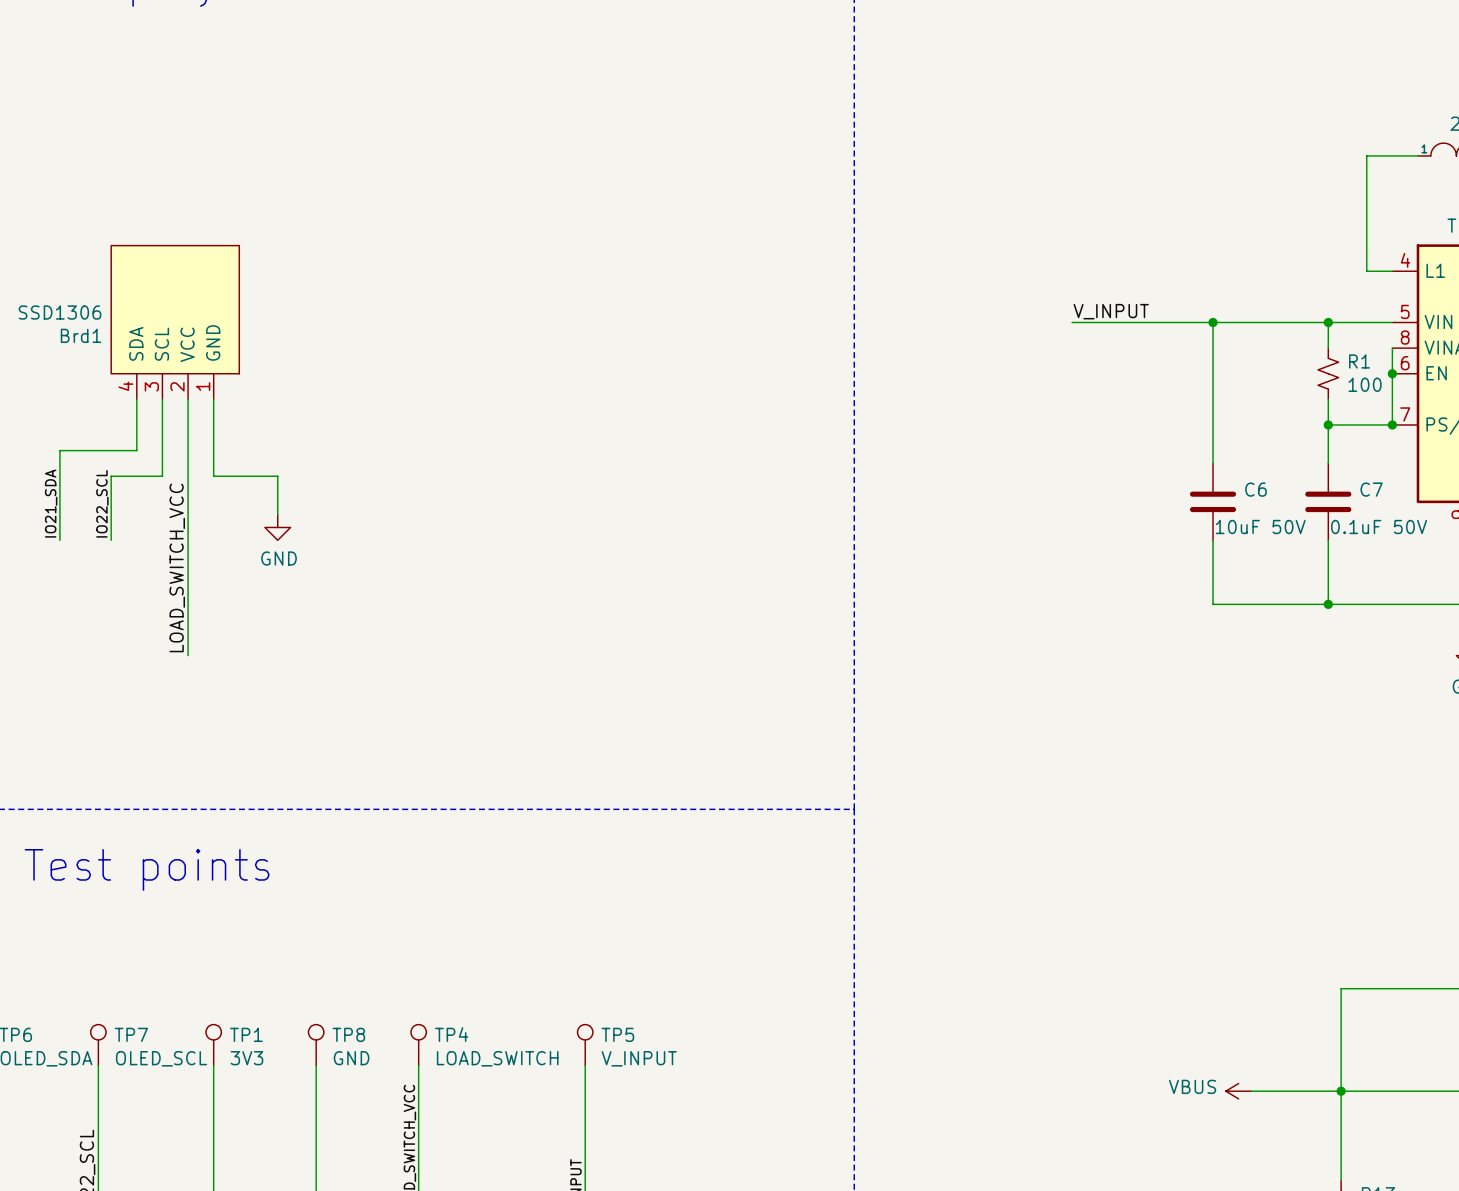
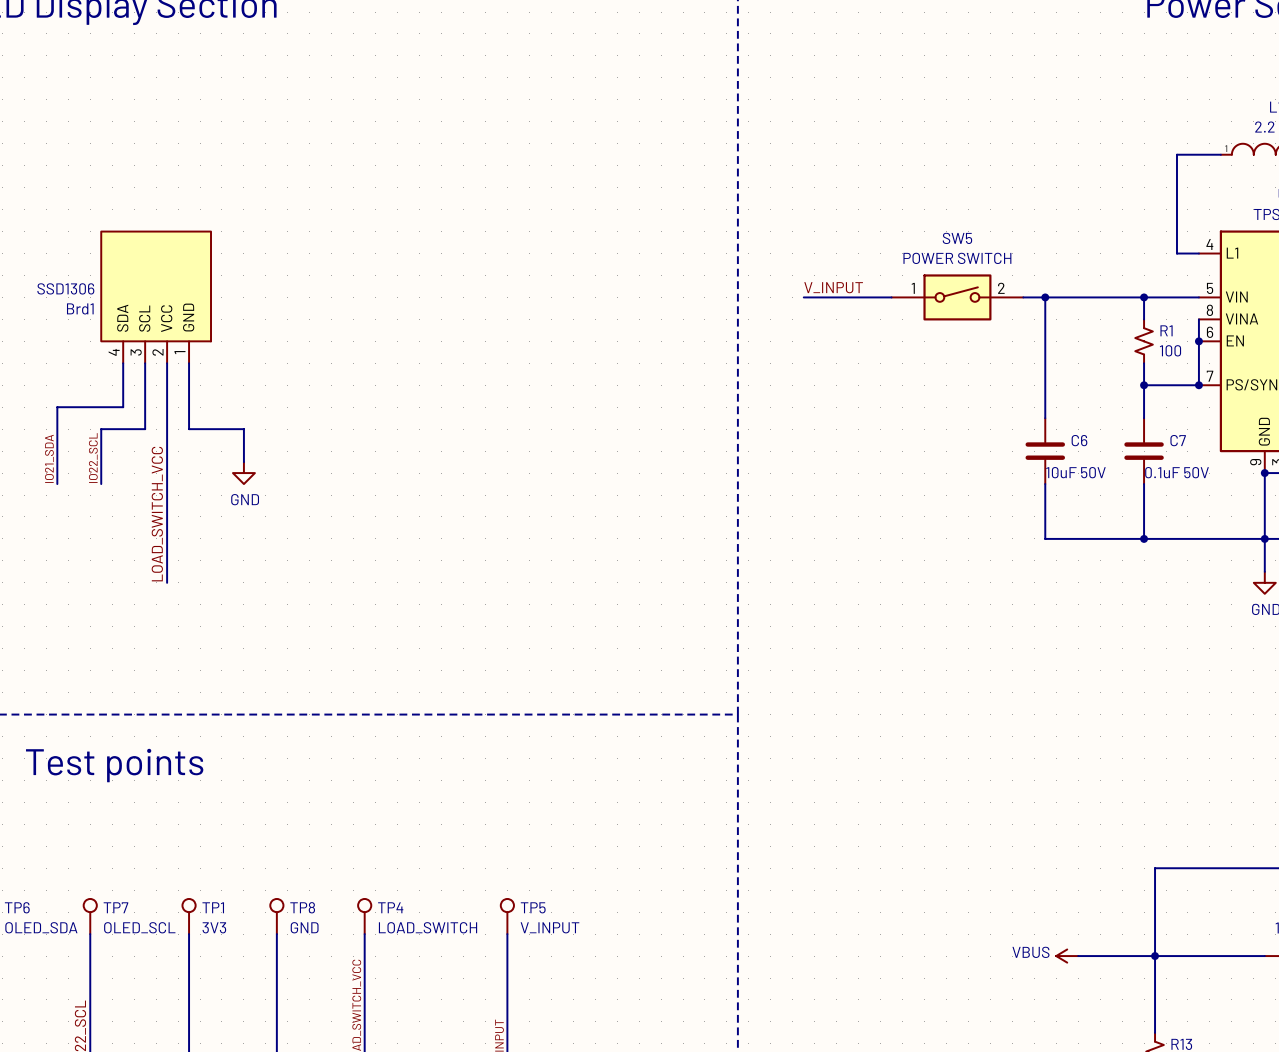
label position: V_INPUT (1111, 311) -> V_INPUT (833, 287)
wire: none -> (803, 297) (891, 297)
SW5: none -> POWER SWITCH (957, 297)

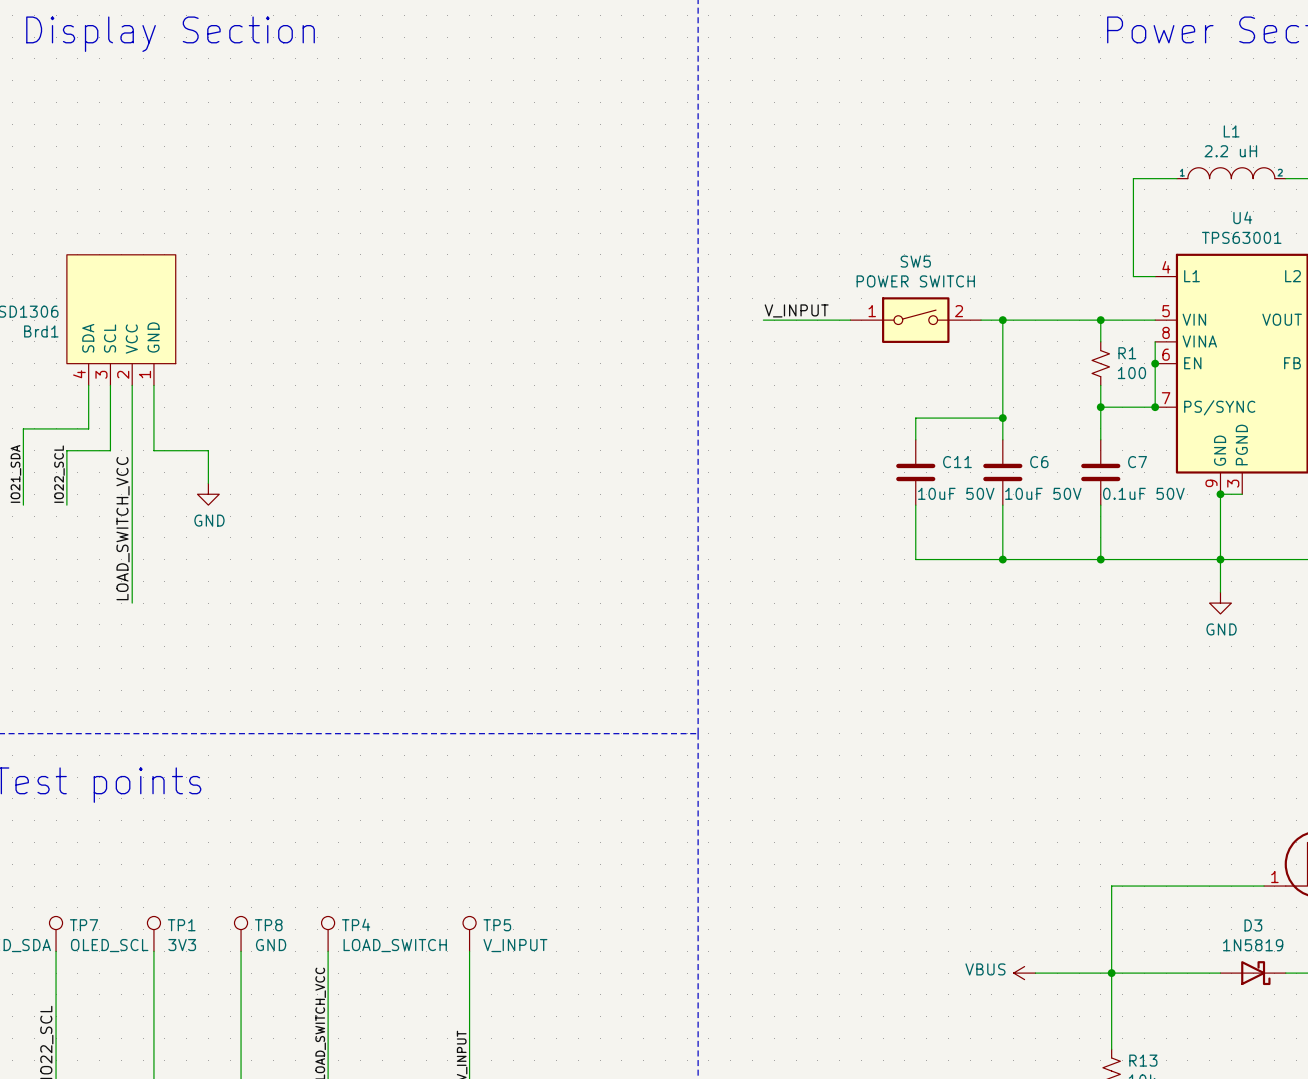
wire: none -> (1002, 418) (915, 418) (915, 439)
junction: none -> (1002, 418)
C11: none -> 10uF 50V (915, 472)
wire: none -> (915, 505) (915, 559) (1002, 559)
junction: none -> (1002, 559)

